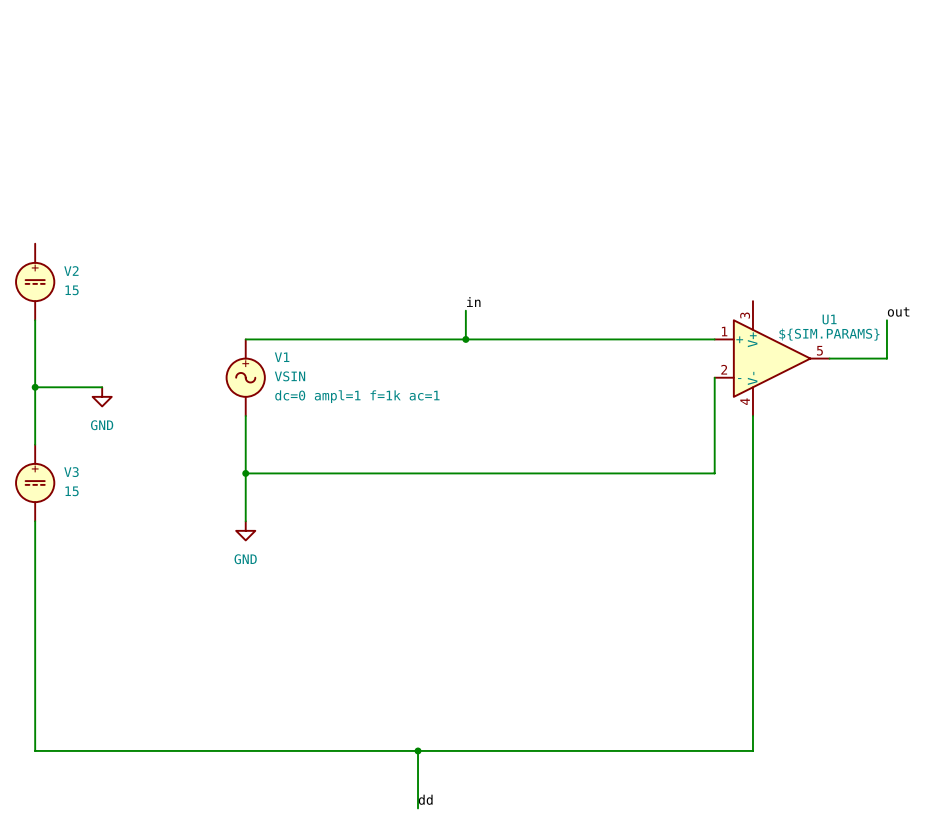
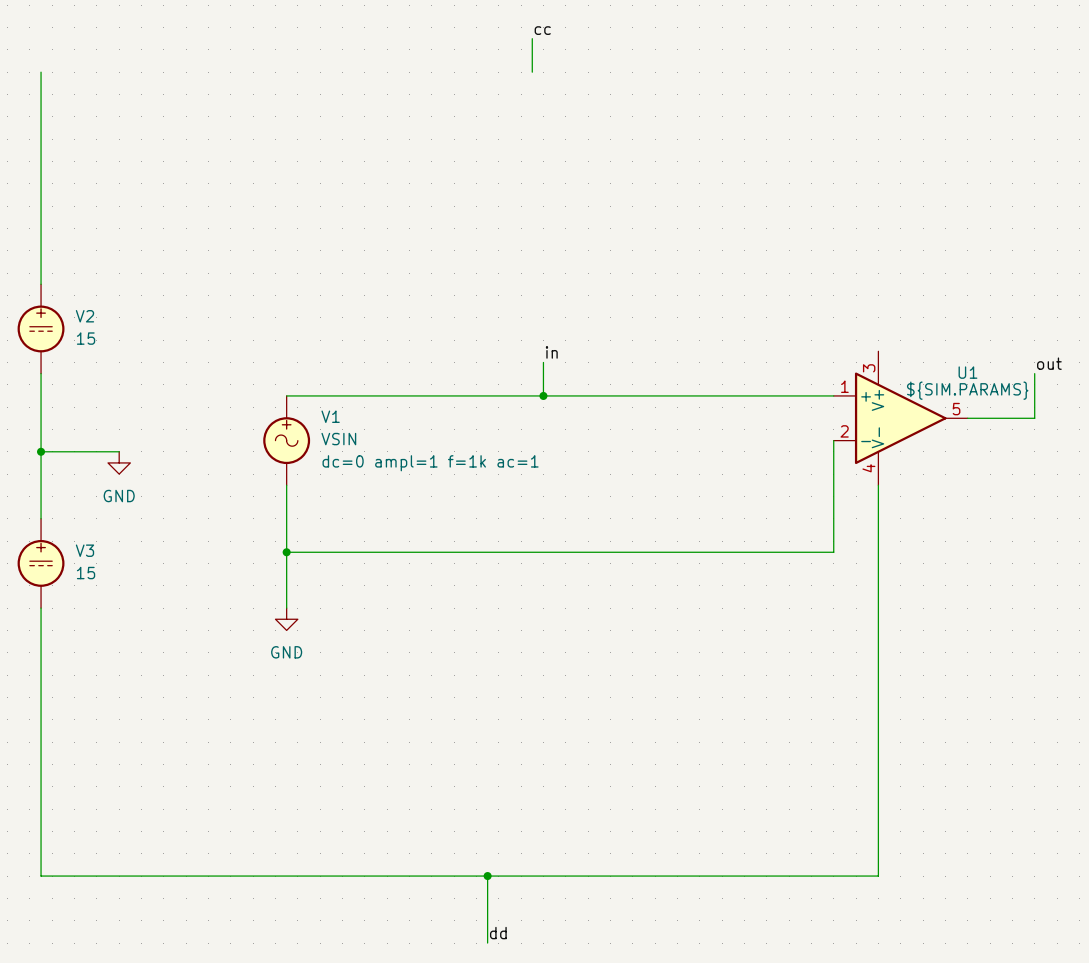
label: none -> cc (542, 30)
wire: none -> (532, 38) (532, 72)
wire: none -> (41, 72) (41, 284)

